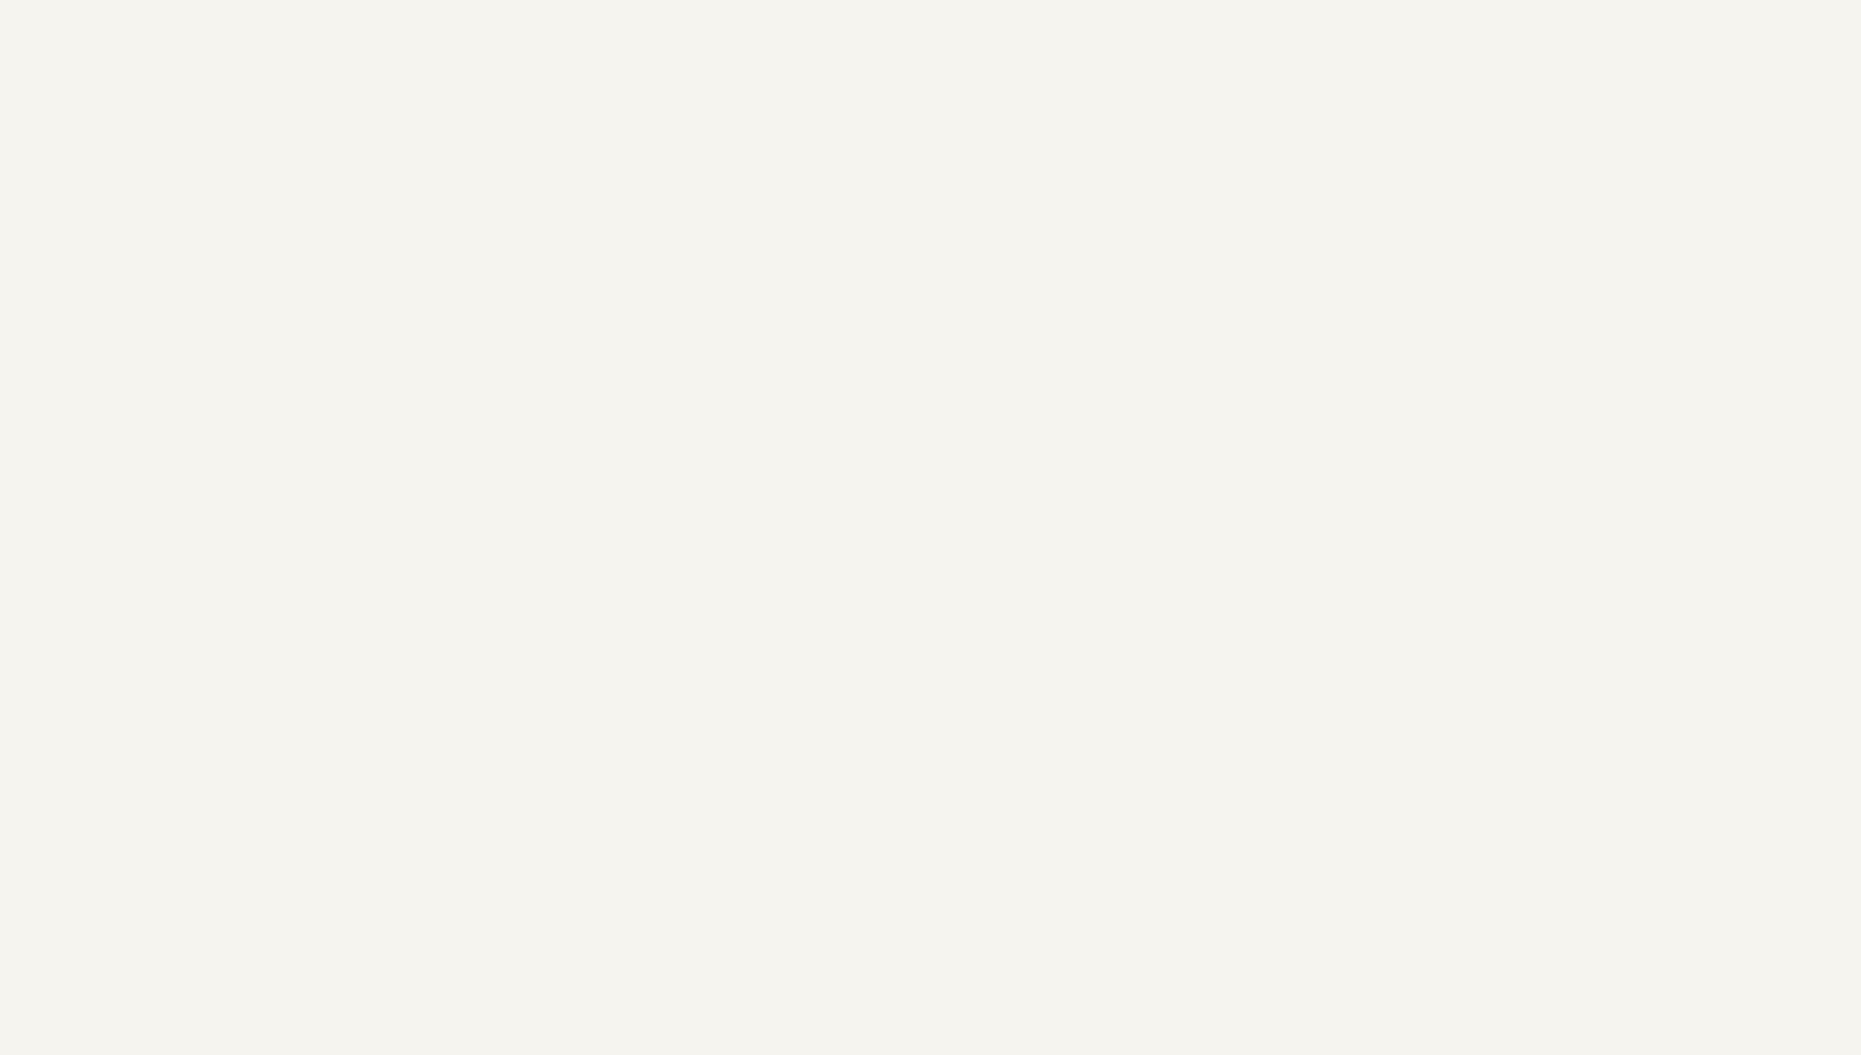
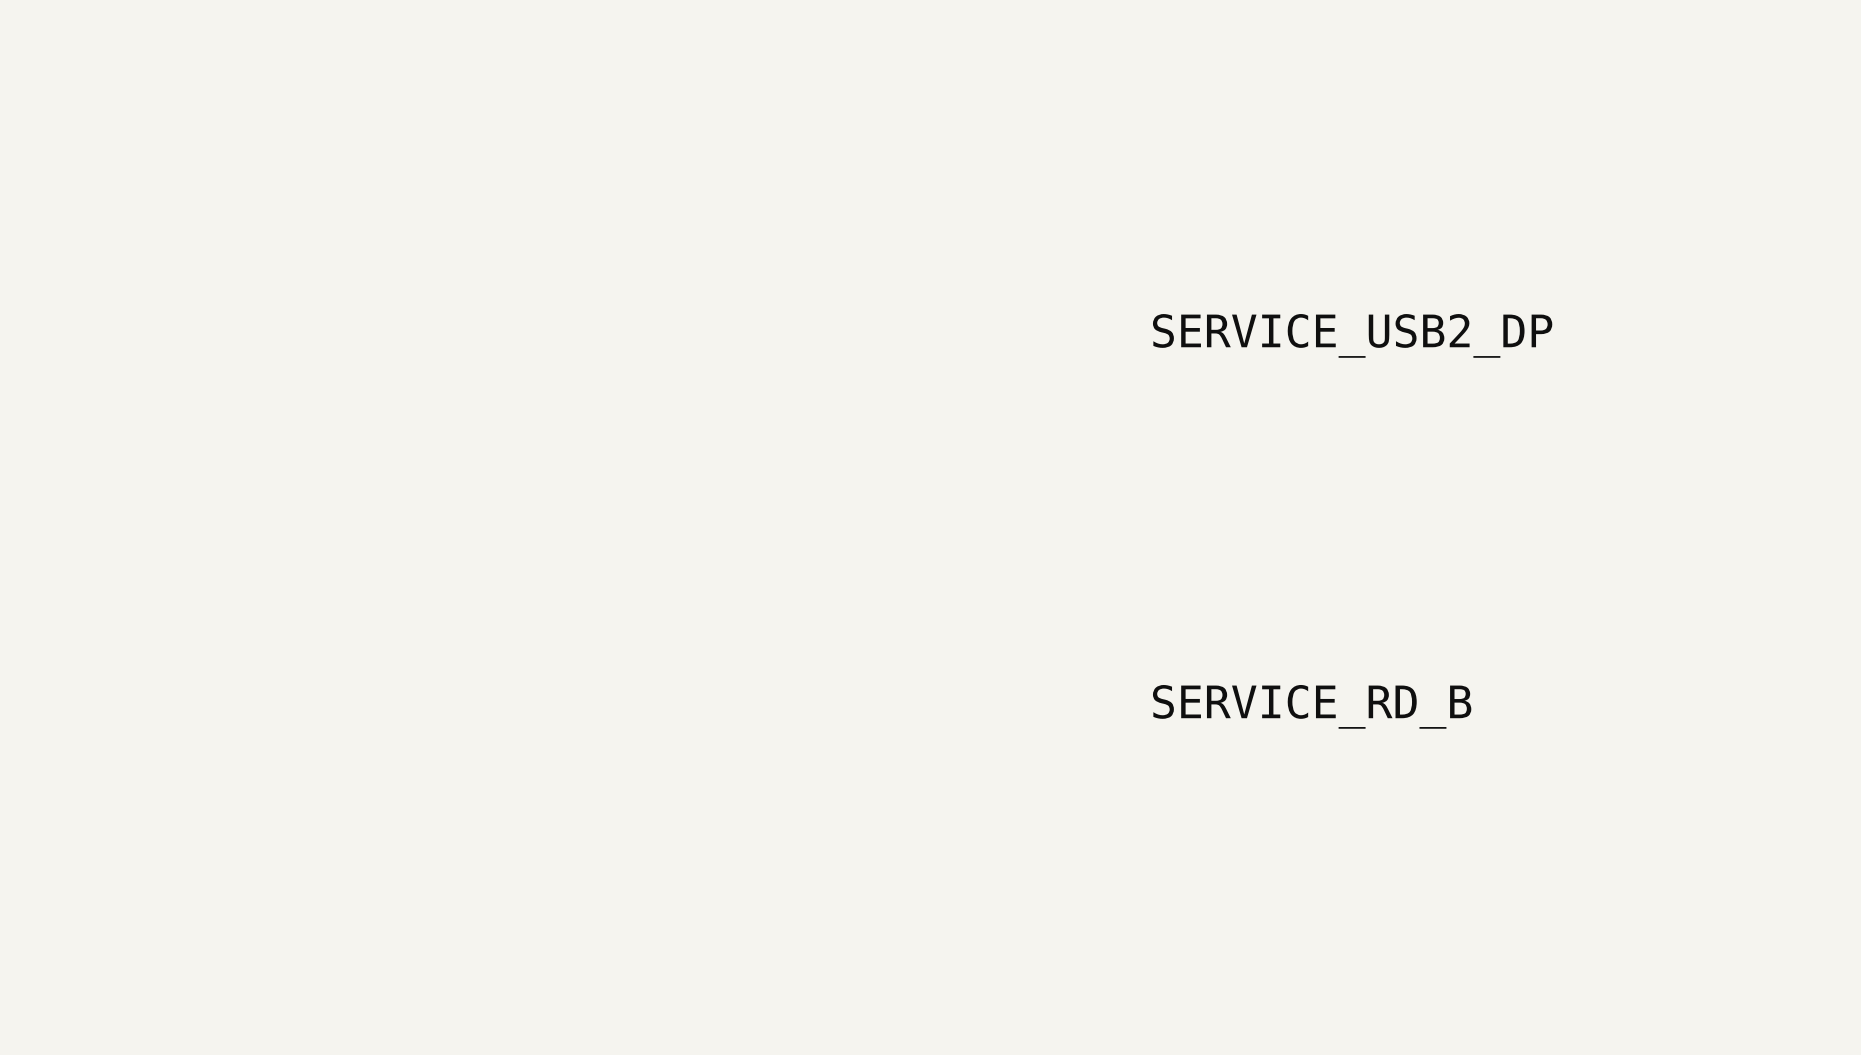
label: none -> SERVICE_USB2_DP (1352, 335)
label: none -> SERVICE_RD_B (1312, 706)

